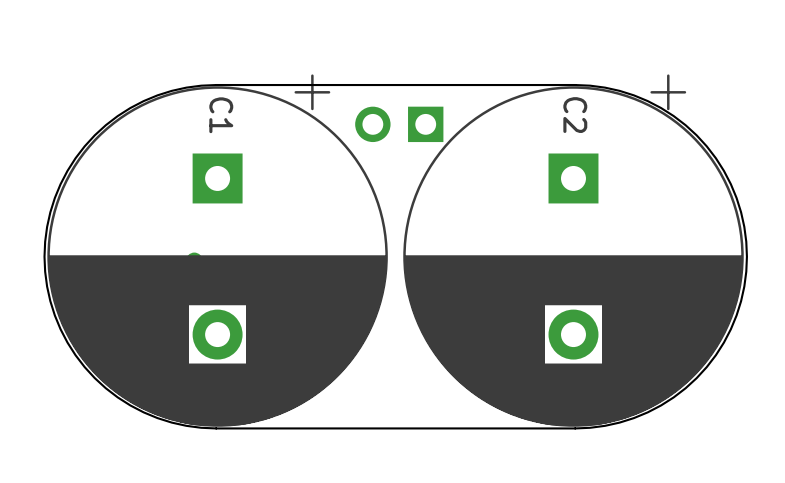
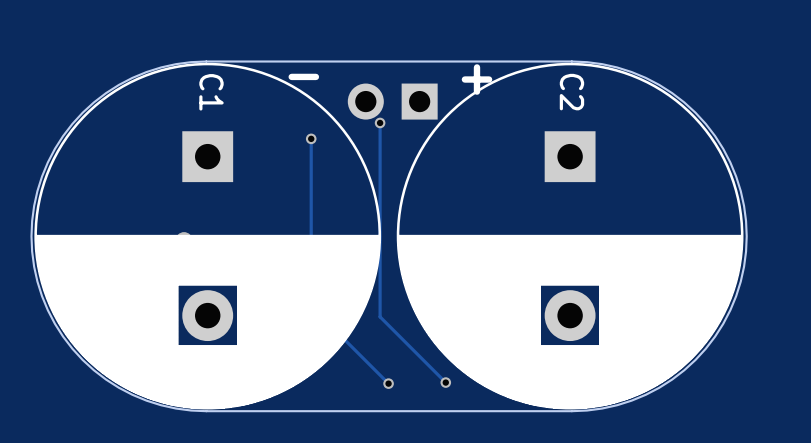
C1 footprint: [47, 74, 388, 427] -> [34, 62, 382, 410]
C2 footprint: [403, 74, 744, 427] -> [396, 62, 744, 410]
text: none -> - (303, 76)
text: none -> + (476, 79)
track: none -> (380, 122) (380, 316) (445, 382)
via: none -> (380, 122)
track: none -> (311, 138) (311, 306) (388, 383)
via: none -> (311, 138)
via: none -> (445, 382)
via: none -> (388, 383)

